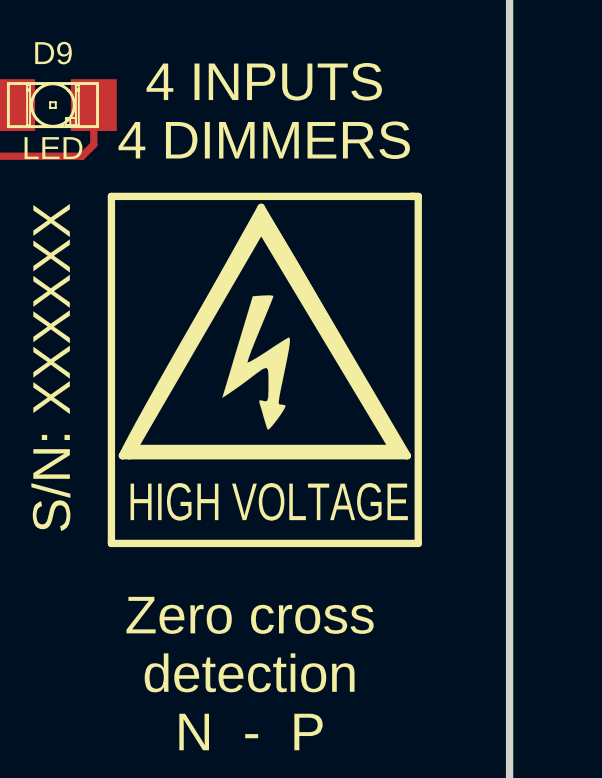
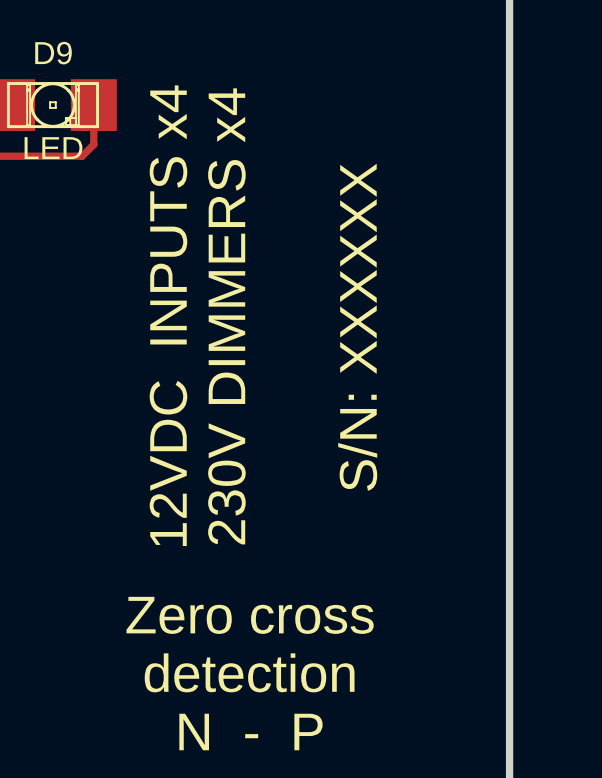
text: 4 INPUTS (264, 81) -> none
text: 4 DIMMERS (264, 140) -> 230V DIMMERS x4 (226, 316)
drawing: [107, 192, 422, 548] -> none
text: none -> 12VDC INPUTS x4 (168, 315)
text position: S/N: XXXXXX (50, 367) -> S/N: XXXXXX (357, 327)

